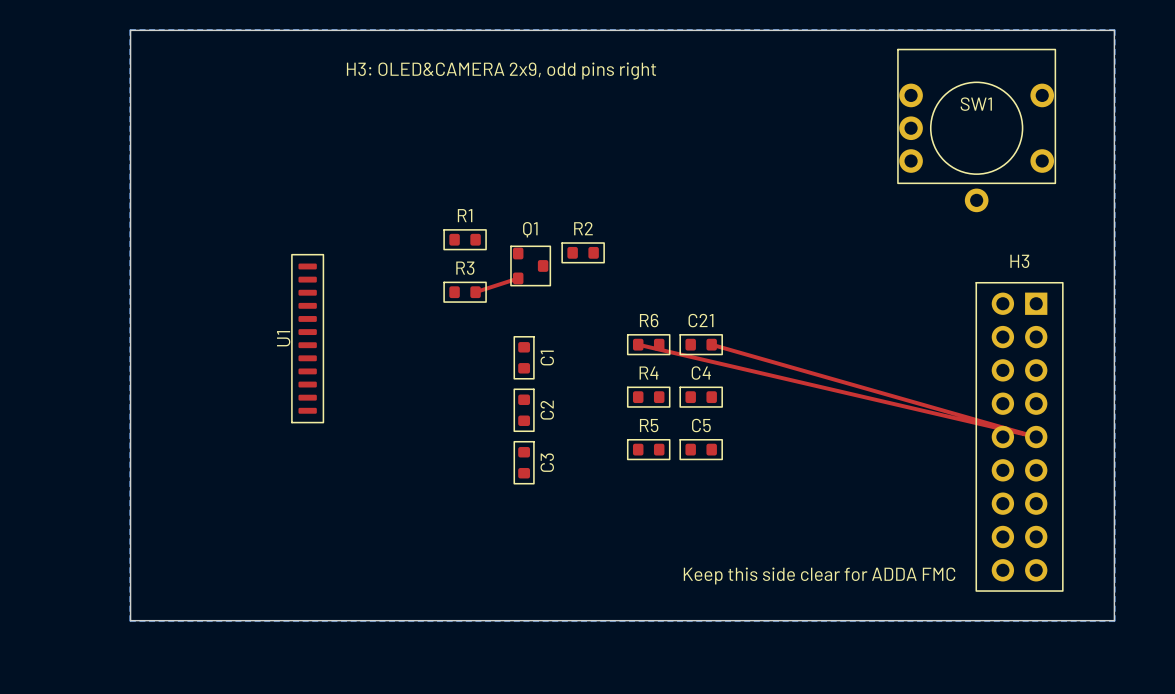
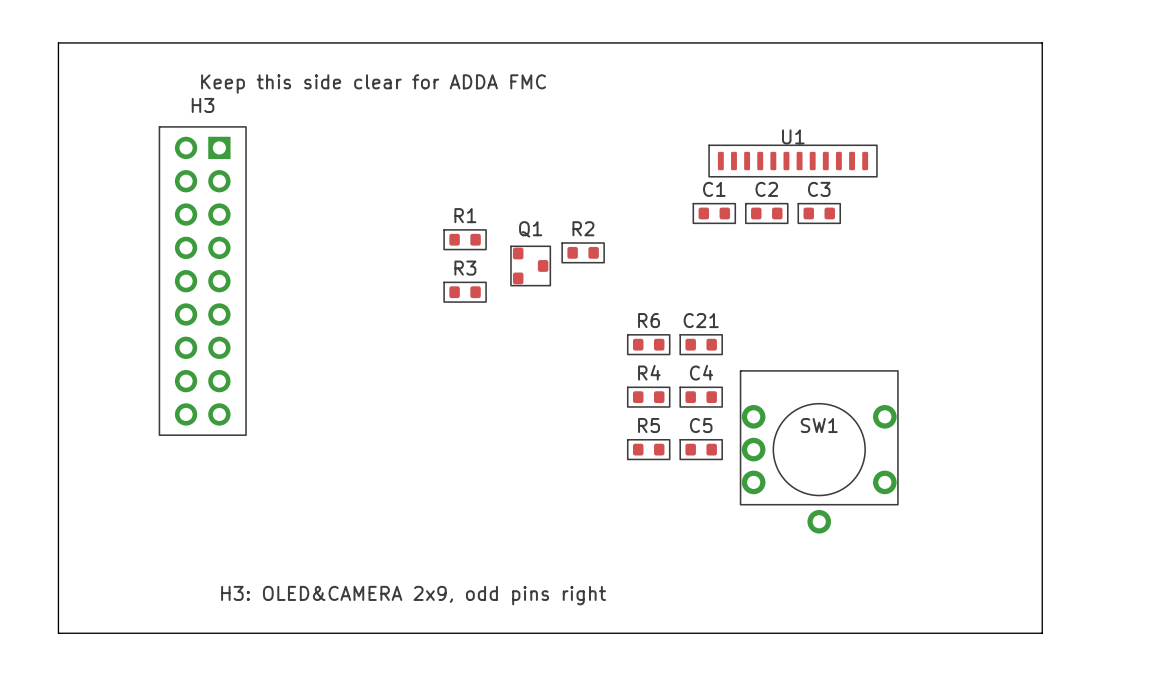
bottom zone outline: (129, 29) (1115, 29) (1115, 621) (129, 621) (129, 29) -> none
board edge: (130, 30) (1114, 30) (1114, 620) (130, 620) (130, 30) -> (58, 42) (1042, 42) (1042, 633) (58, 633) (58, 42)
text: H3: OLED&CAMERA 2x9, odd pins right (501, 71) -> none
text: none -> Keep this side clear for ADDA FMC (373, 84)
SW1 position: (976, 130) -> (819, 451)
top track: (518, 278) (475, 292) -> none
U1 rotation: 0° (307, 338) -> 90° clockwise (793, 161)
U1 position: (307, 338) -> (793, 161)
top track: (638, 344) (1036, 437) (711, 344) -> none
C1 rotation: 0° (524, 357) -> 90° clockwise (714, 213)
C1 position: (524, 357) -> (714, 213)
C1 name position: C1 (547, 357) -> C1 (714, 189)
C2 rotation: 0° (524, 410) -> 90° clockwise (766, 213)
C2 position: (524, 410) -> (766, 213)
C2 name position: C2 (547, 410) -> C2 (766, 189)
H3 position: (1019, 436) -> (202, 281)
C3 rotation: 0° (524, 462) -> 90° clockwise (819, 213)
C3 position: (524, 462) -> (819, 213)
C3 name position: C3 (547, 462) -> C3 (819, 189)
text: Keep this side clear for ADDA FMC (819, 575) -> none
text: none -> H3: OLED&CAMERA 2x9, odd pins right (413, 595)

